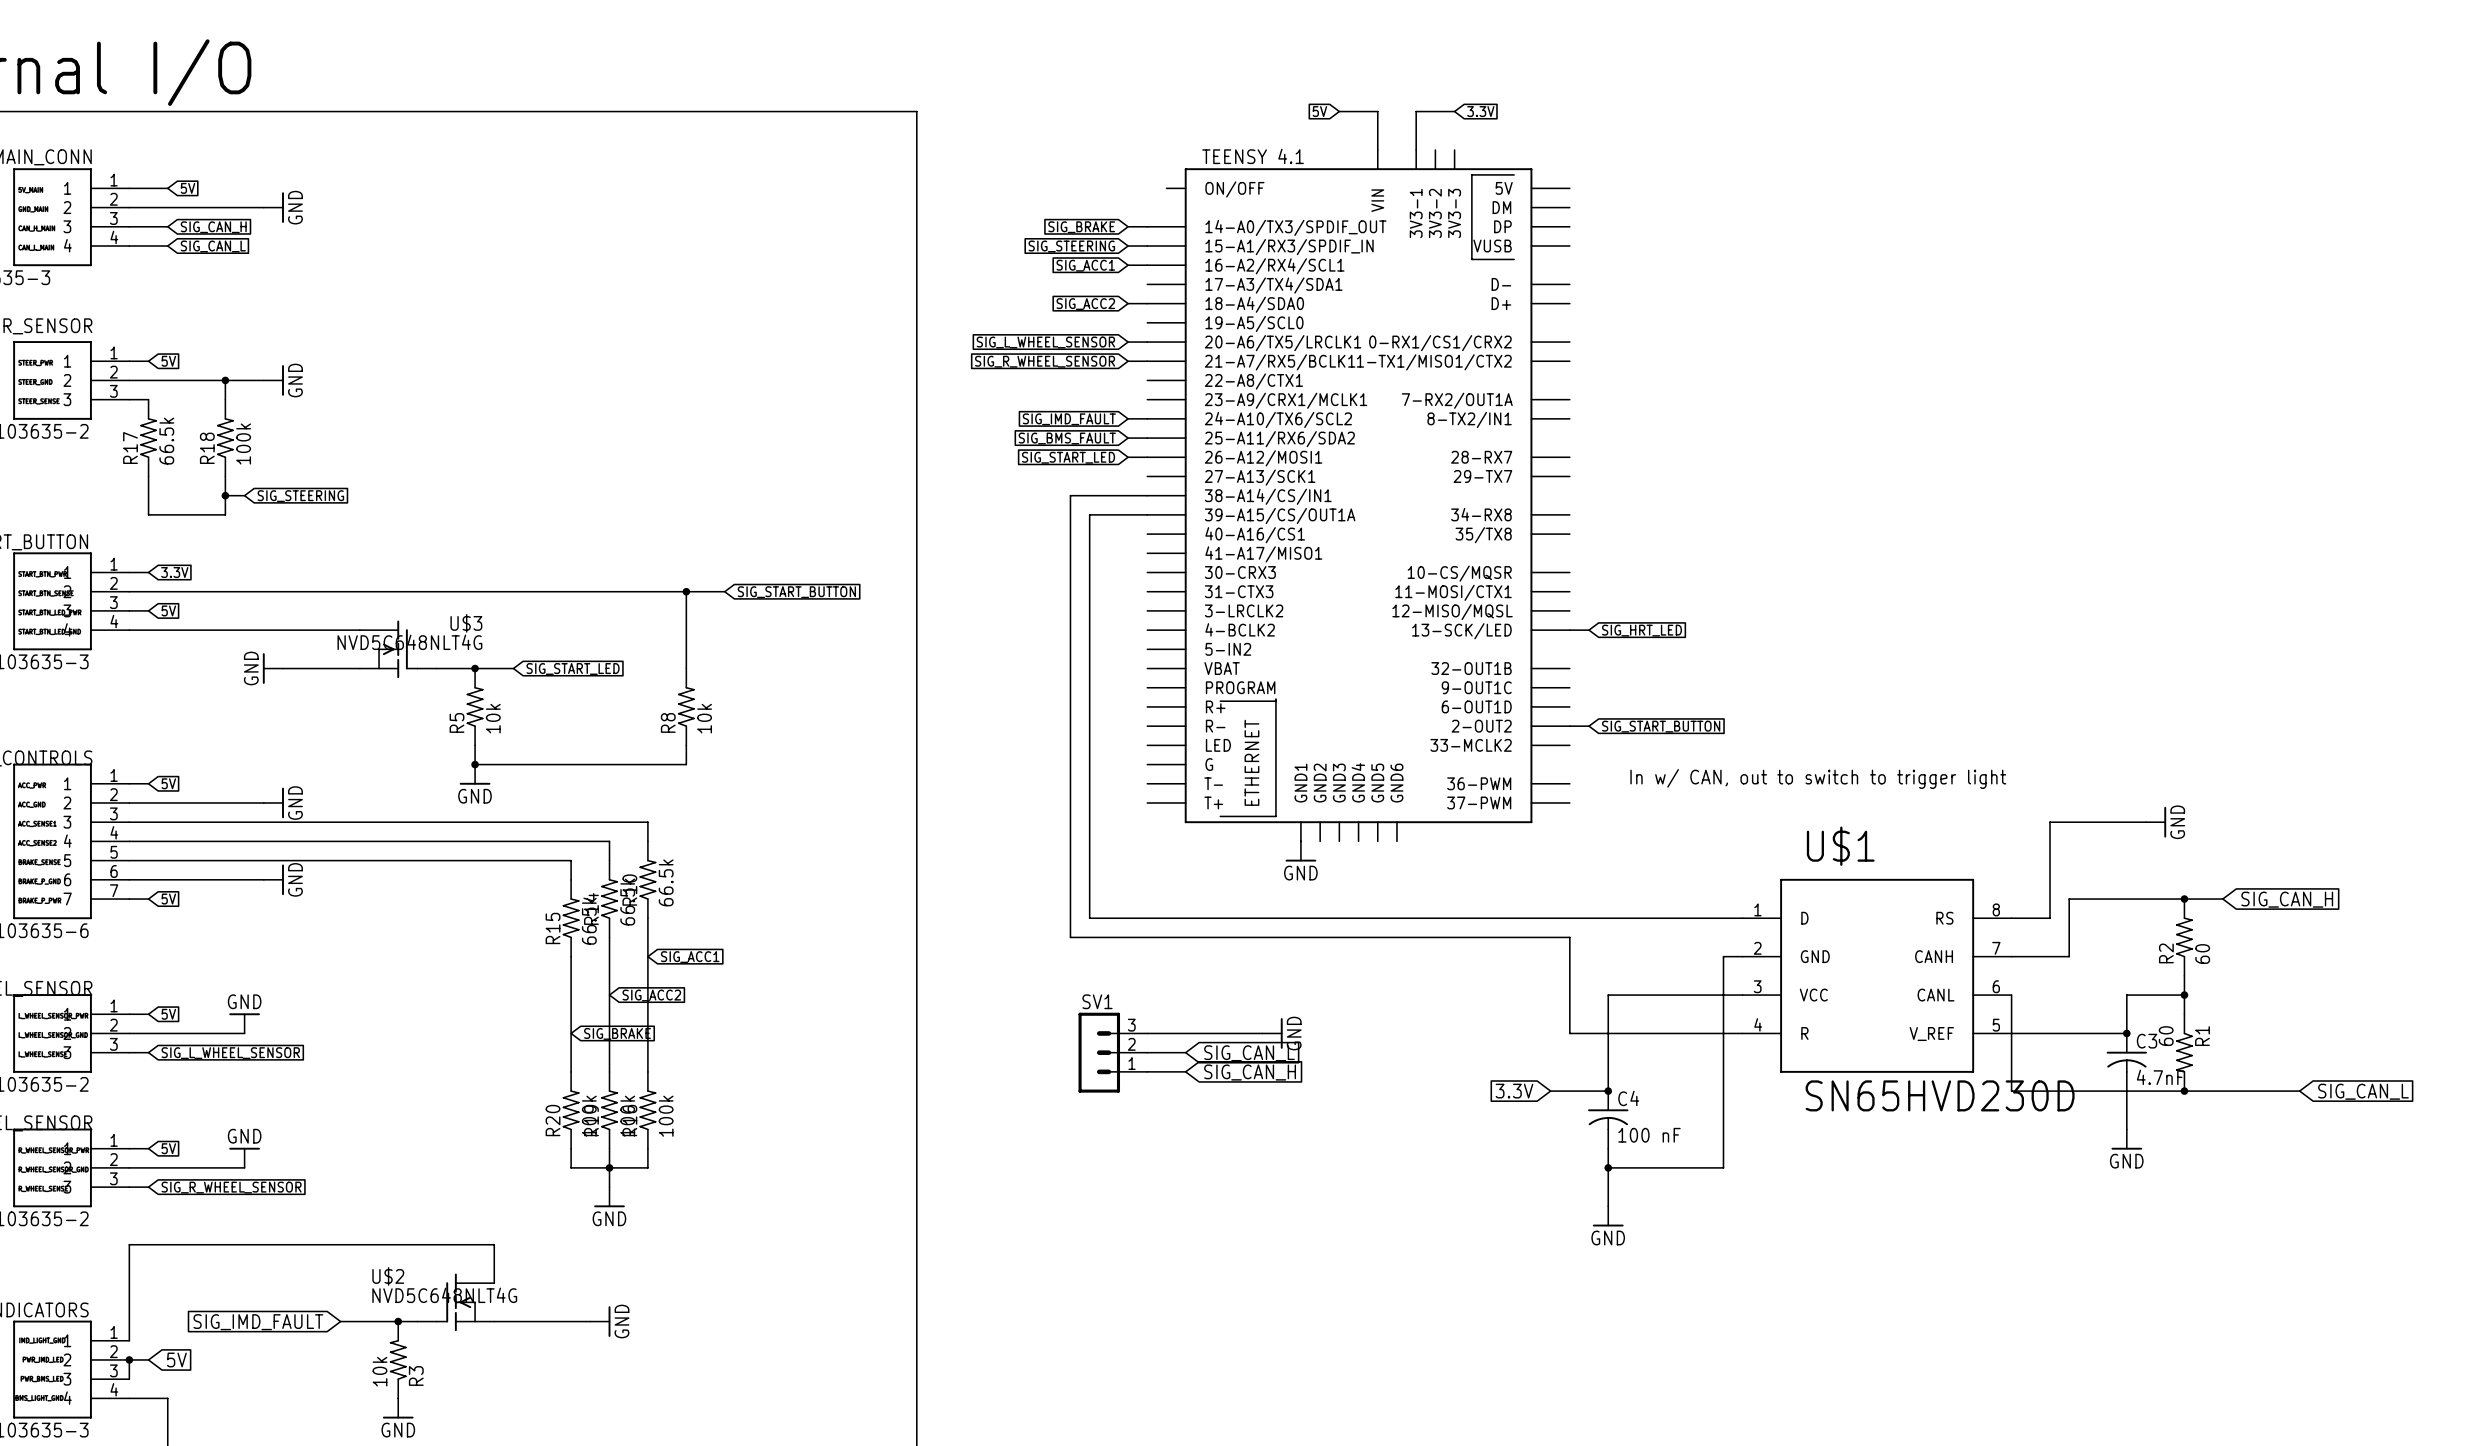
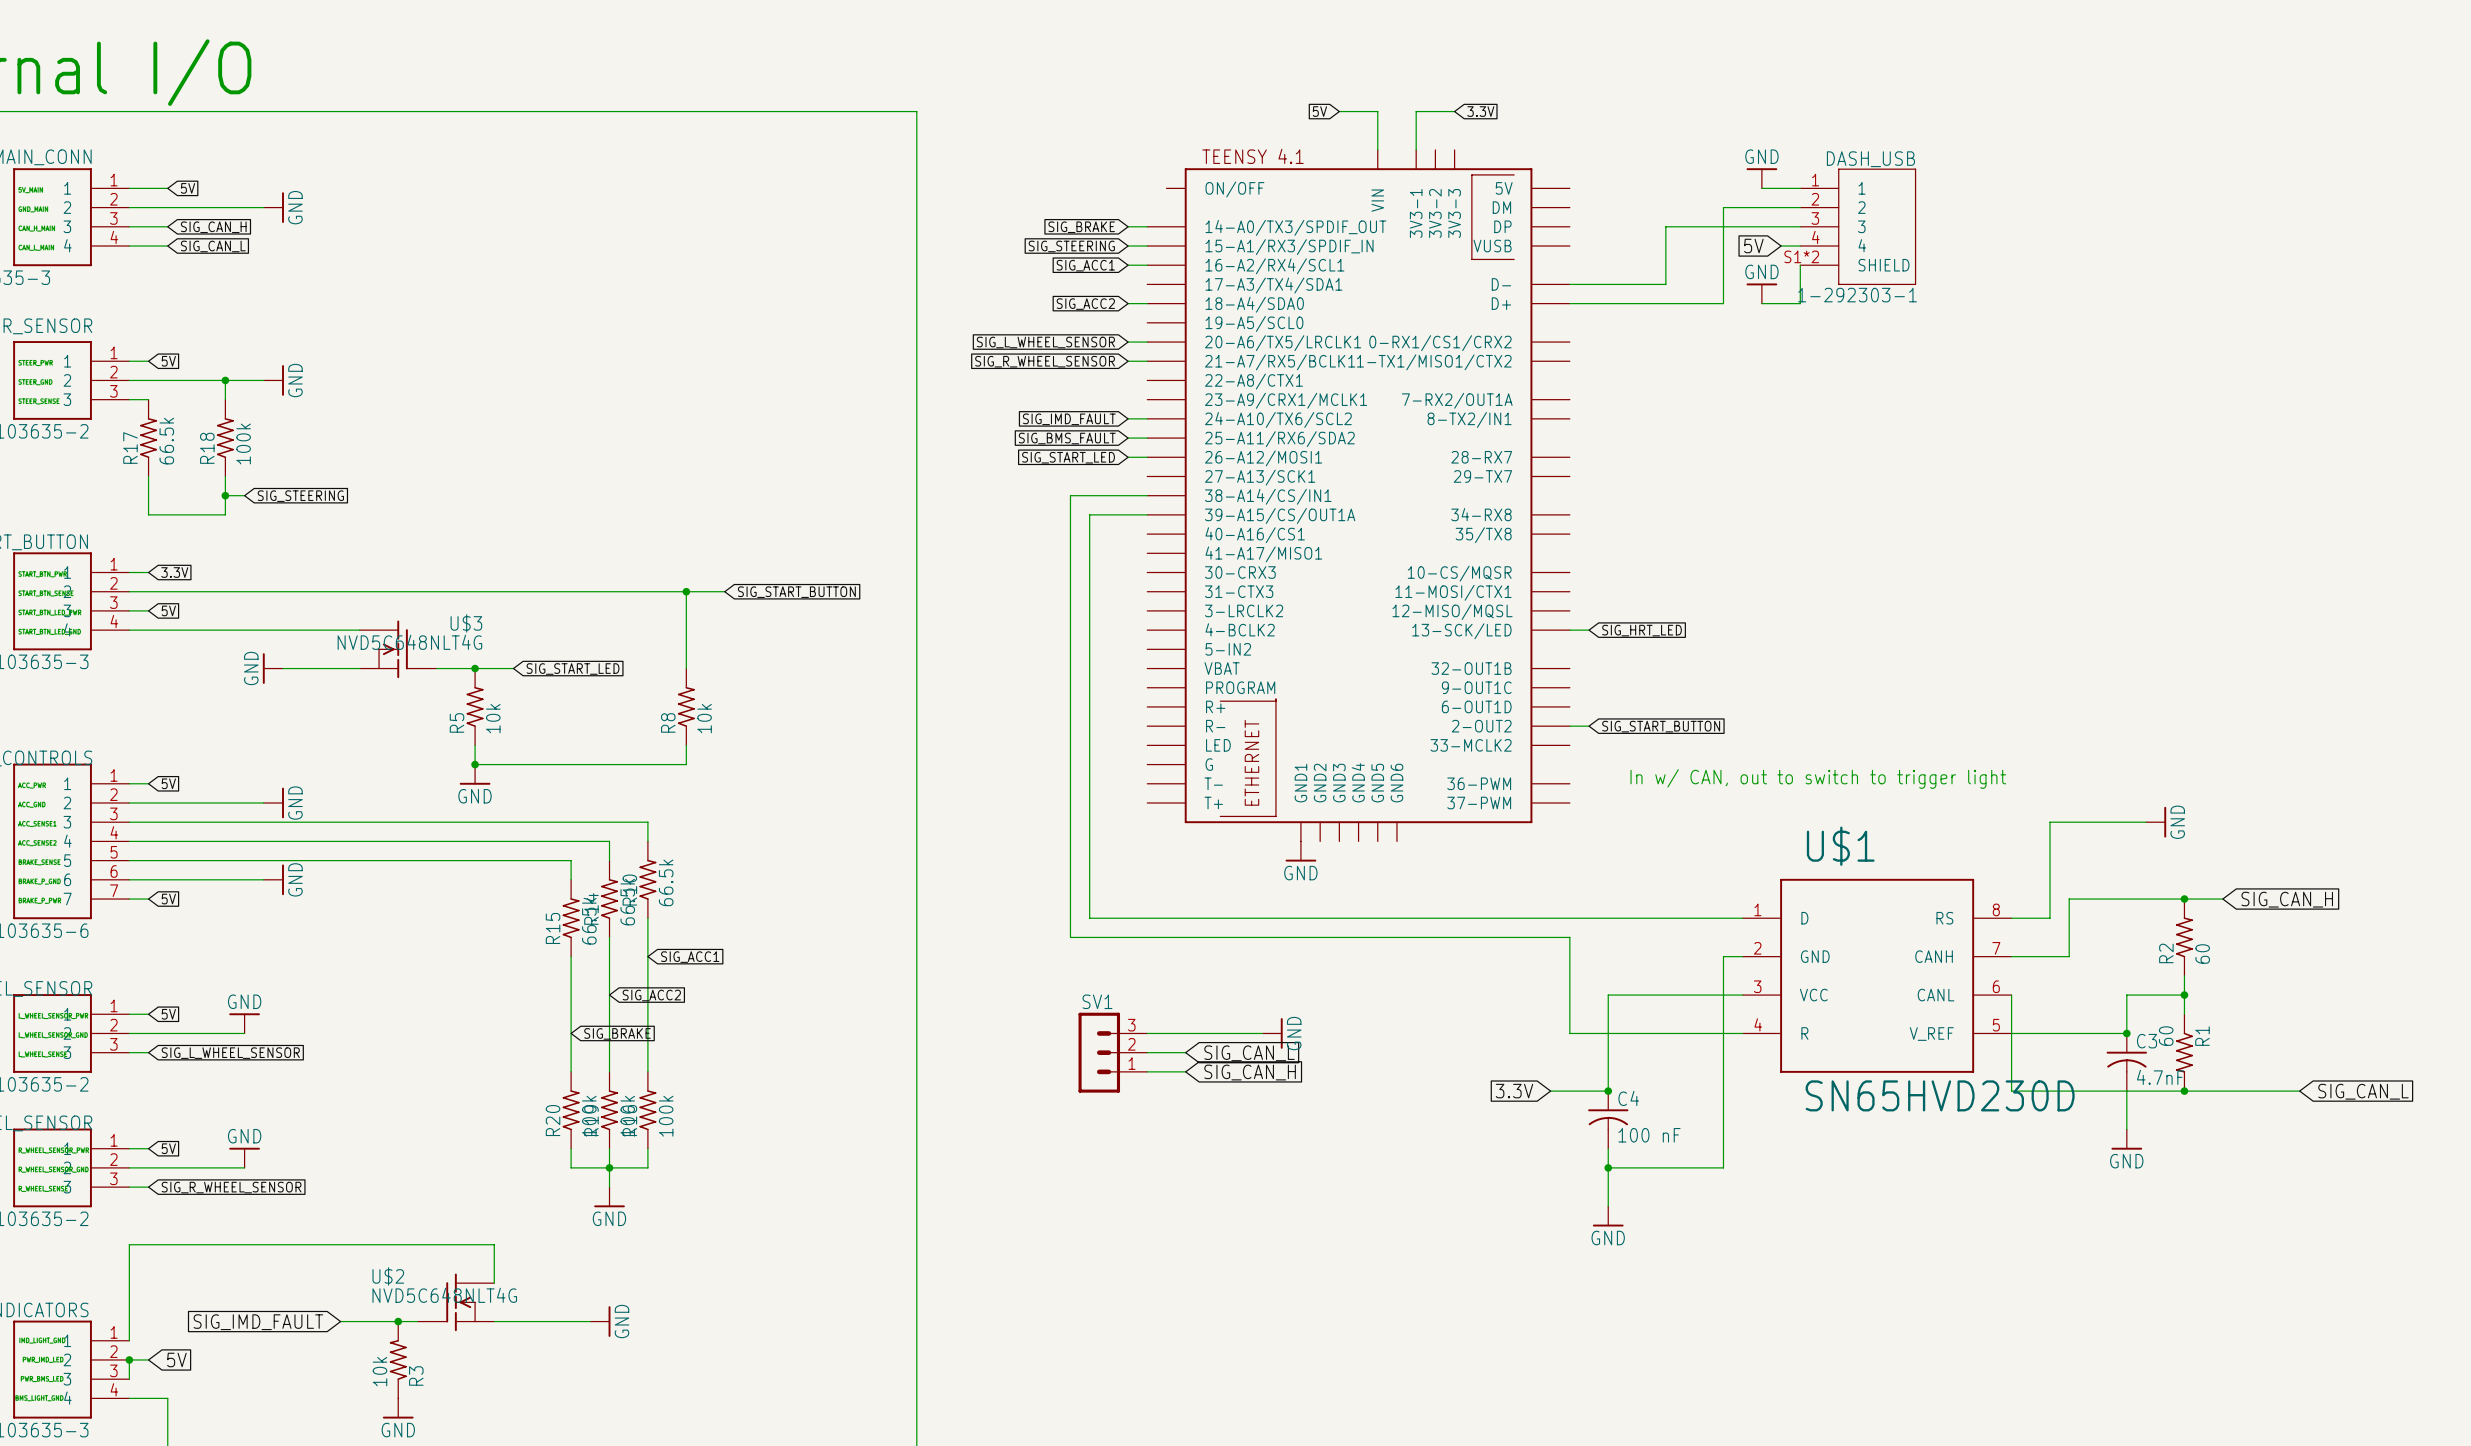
power symbol: none -> GND (1761, 178)
wire: none -> (1761, 188) (1800, 188)
wire: none -> (1800, 207) (1723, 207) (1723, 303) (1569, 303)
wire: none -> (1800, 226) (1665, 226) (1665, 284) (1569, 284)
DASH_USB: none -> 1-292303-1 (1858, 226)
global label: none -> 5V (1753, 246)
wire: none -> (1781, 246) (1800, 246)
wire: none -> (1800, 265) (1800, 303) (1761, 303)
power symbol: none -> GND (1761, 293)

